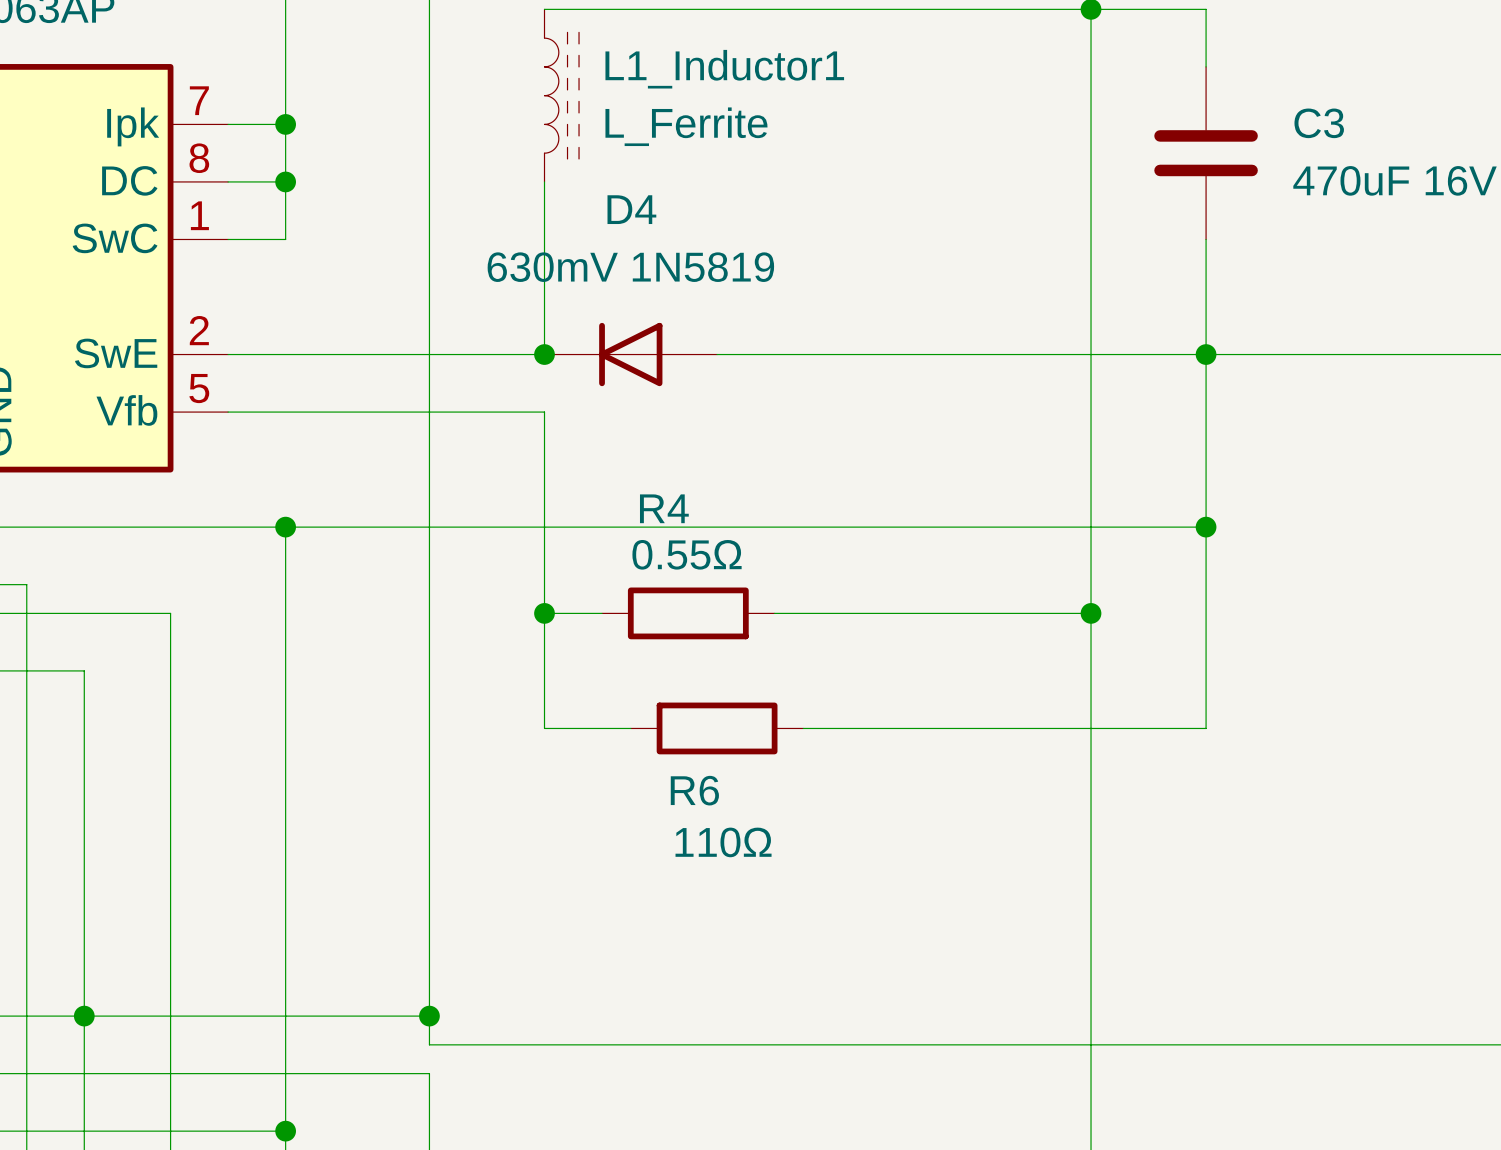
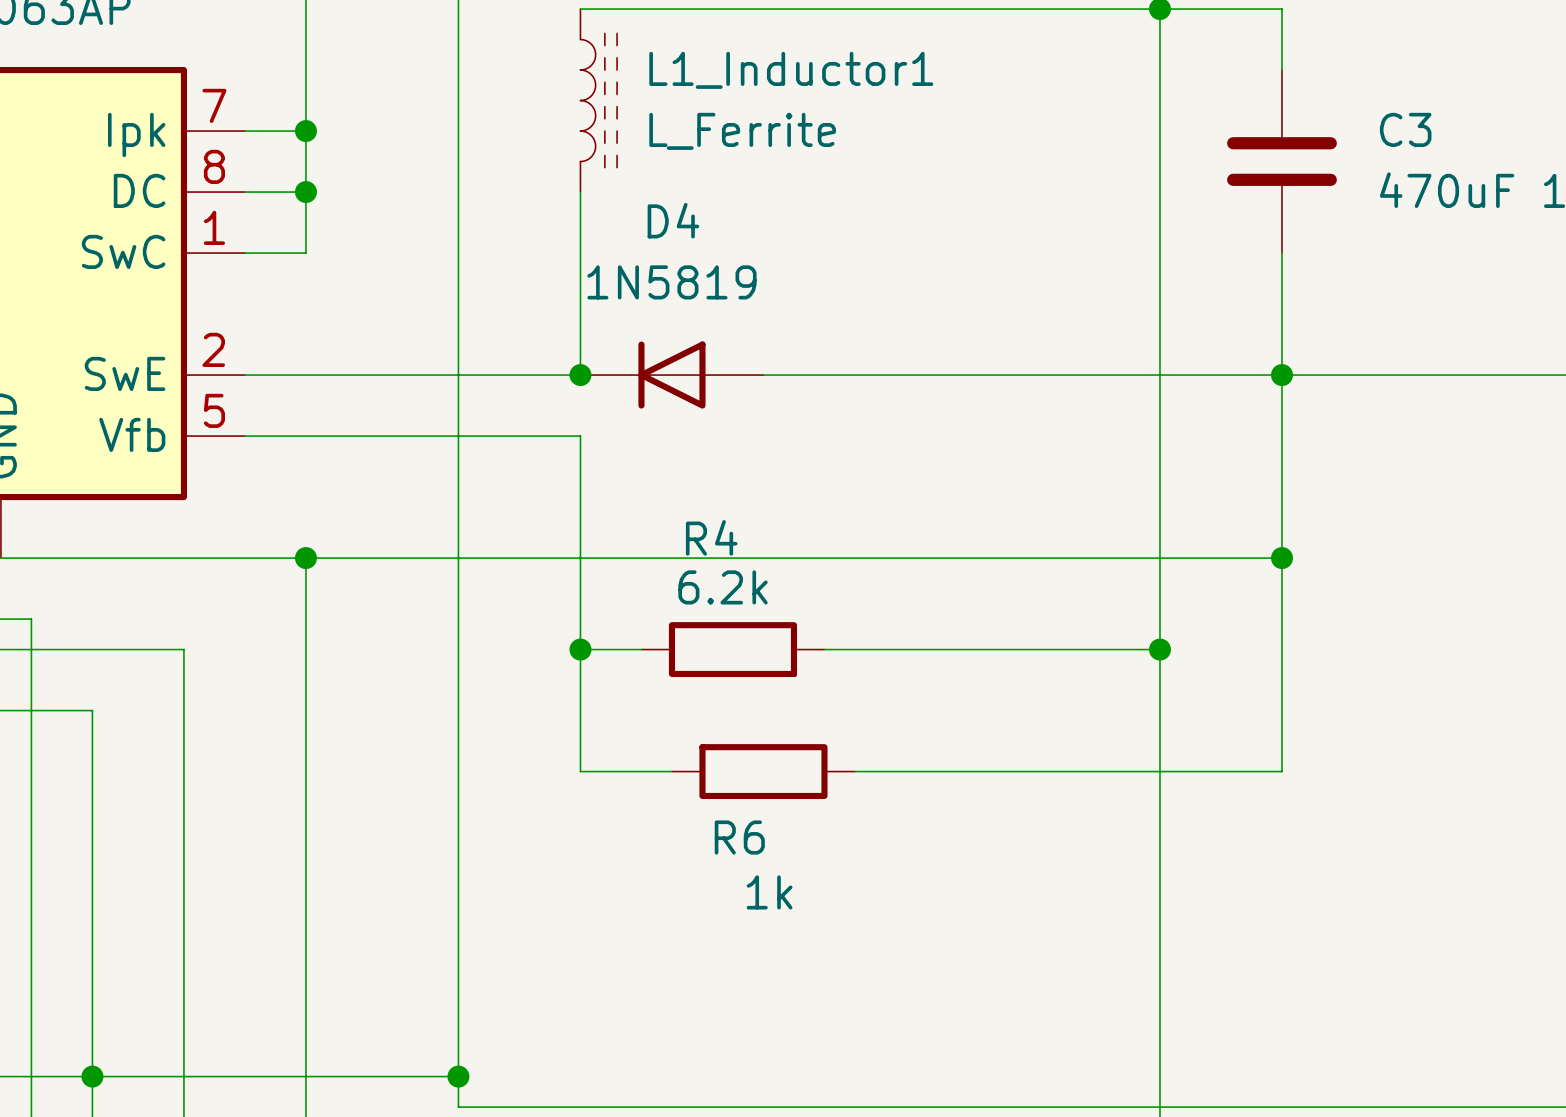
D4 value: 630mV 1N5819 (630, 267) -> 1N5819 (671, 282)
R4 value: 0.55Ω (687, 554) -> 6.2k (723, 587)
R6 value: 110Ω (723, 842) -> 1k (769, 892)

